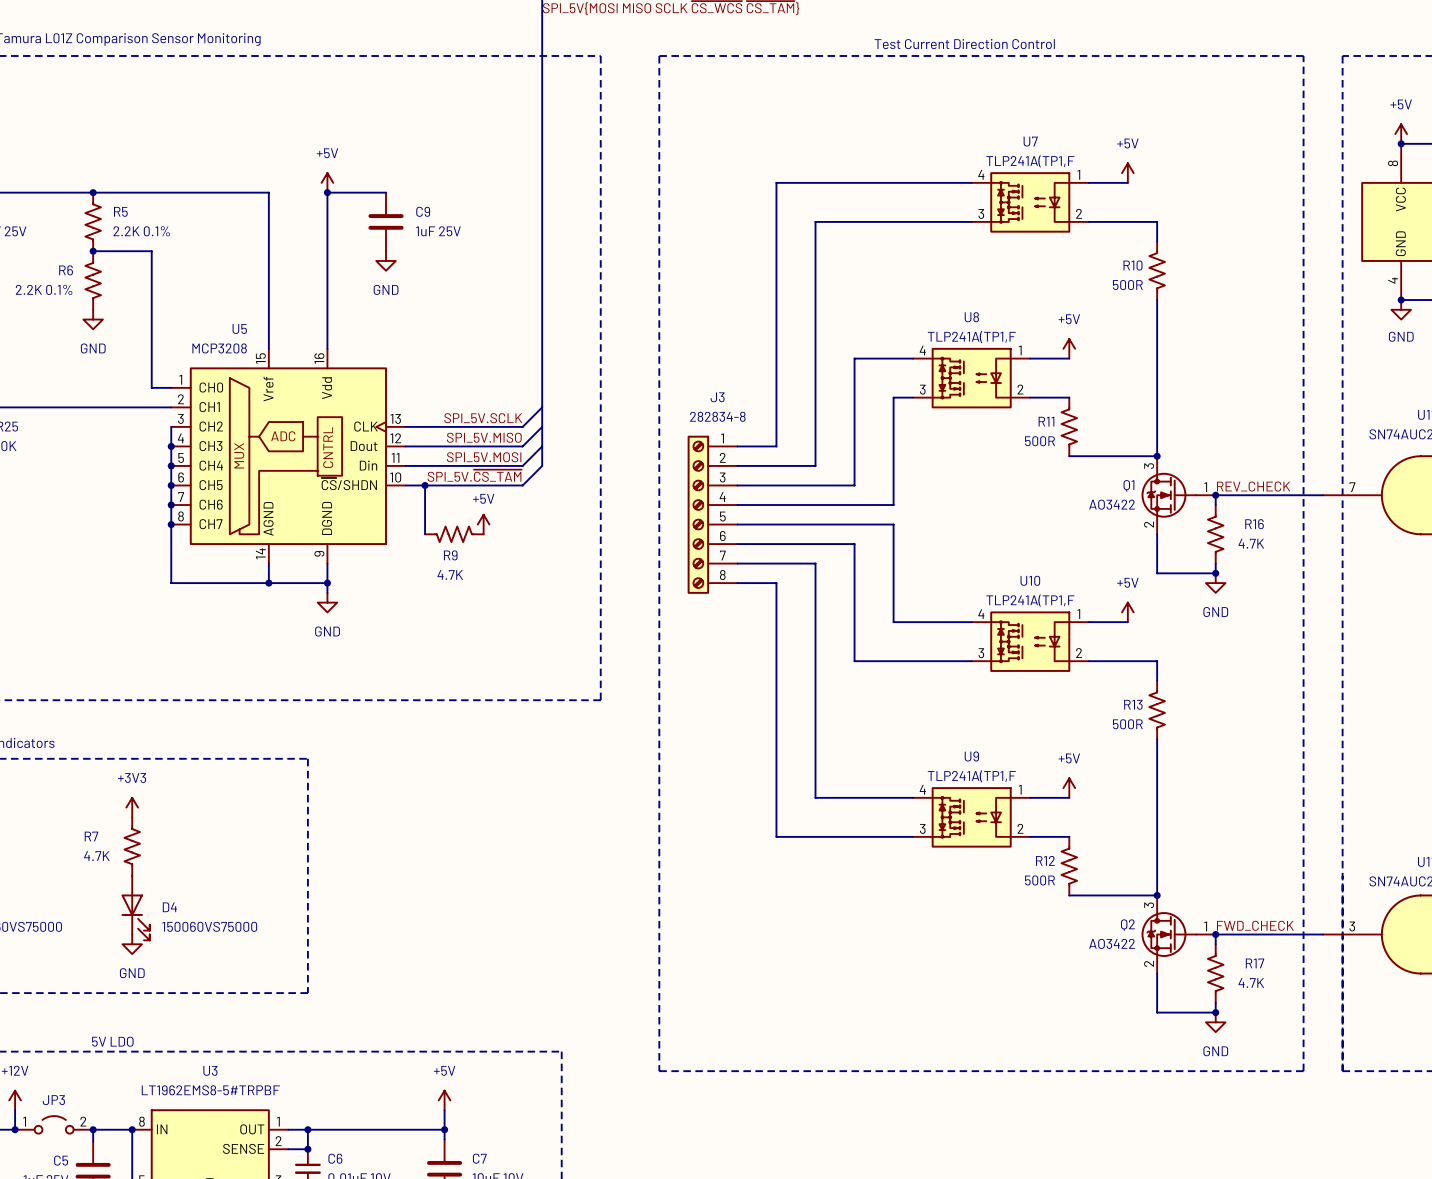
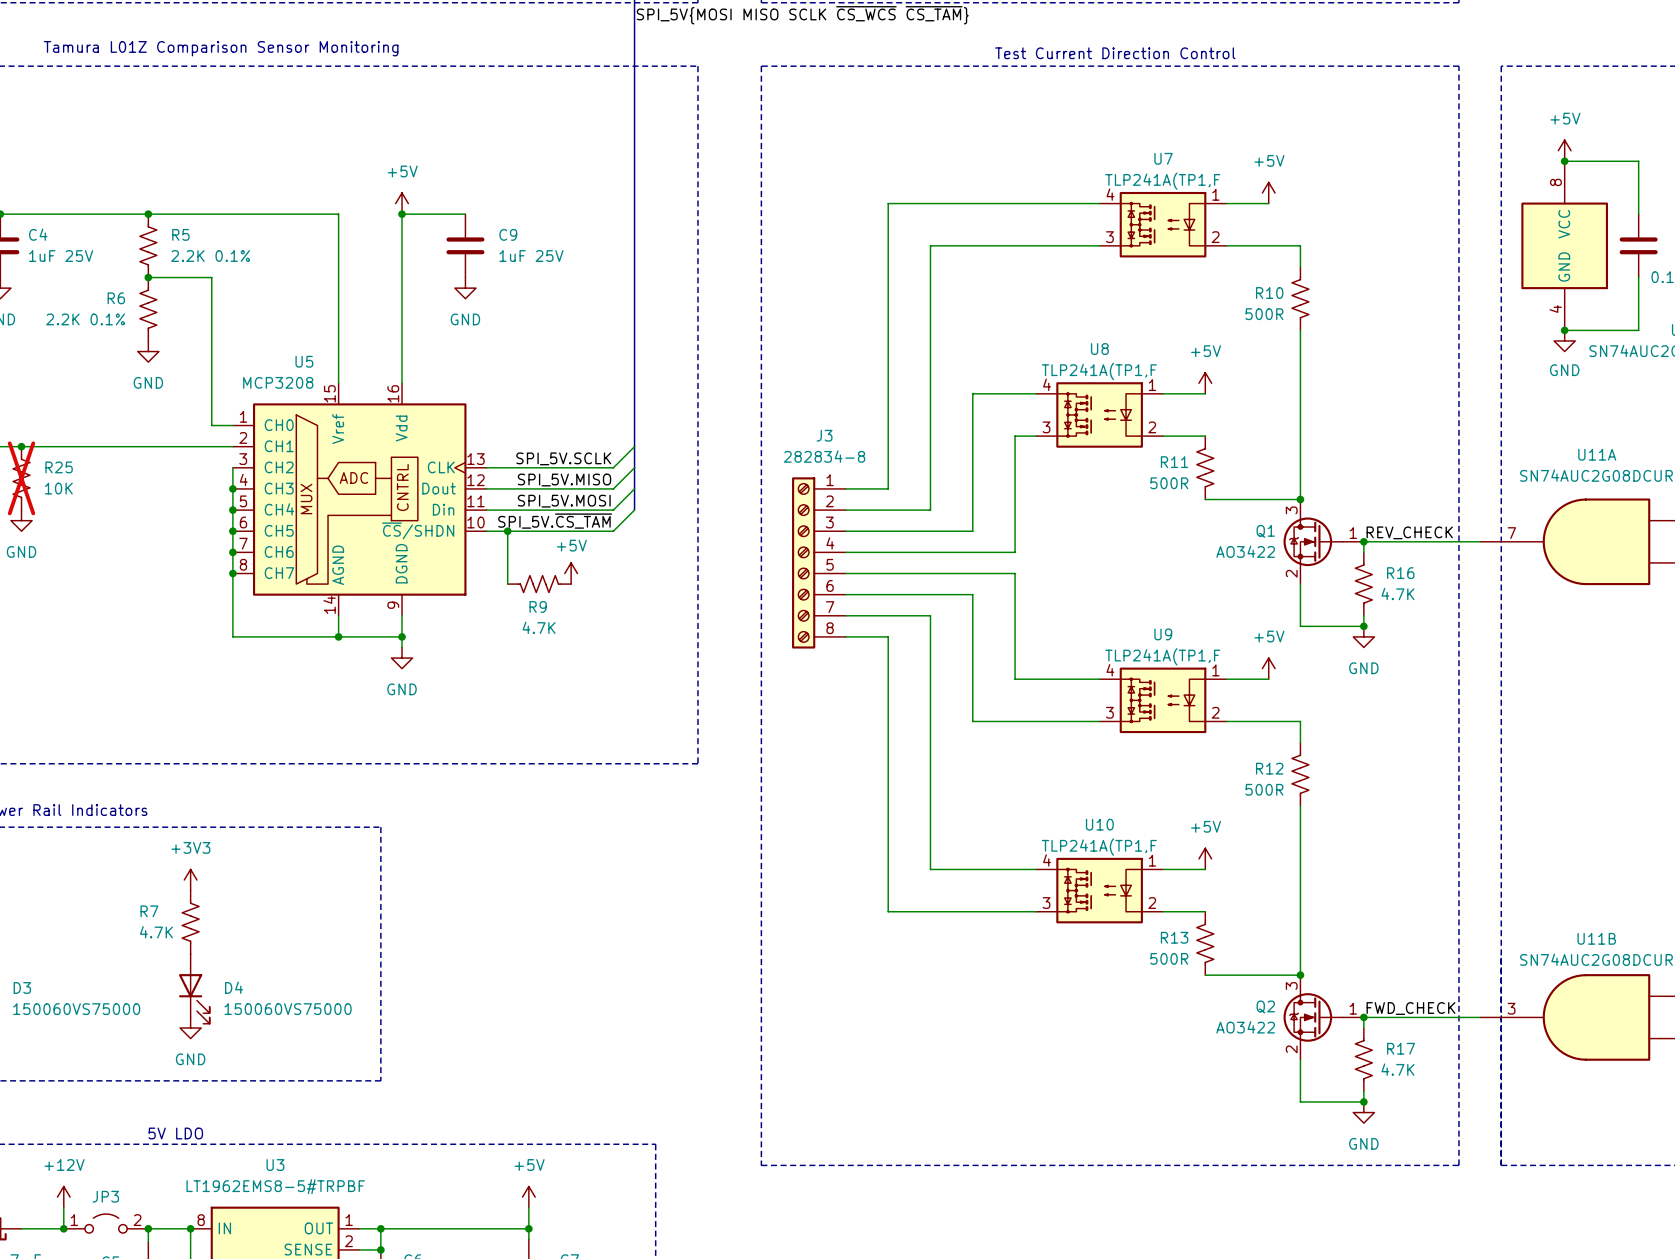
U10 name: U10 (1030, 580) -> U9 (1163, 634)
R13 name: R13 (1133, 704) -> R12 (1269, 768)
U9 name: U9 (971, 756) -> U10 (1099, 824)
R12 name: R12 (1045, 860) -> R13 (1174, 937)

